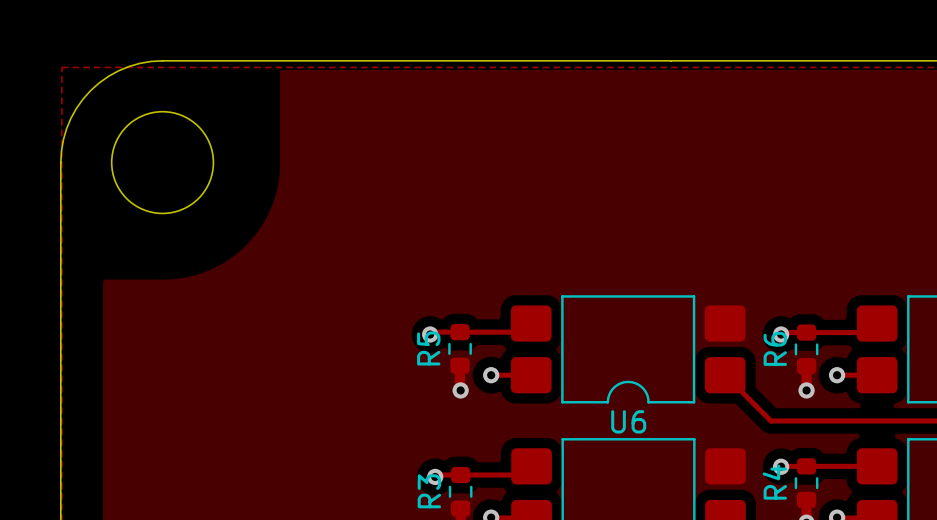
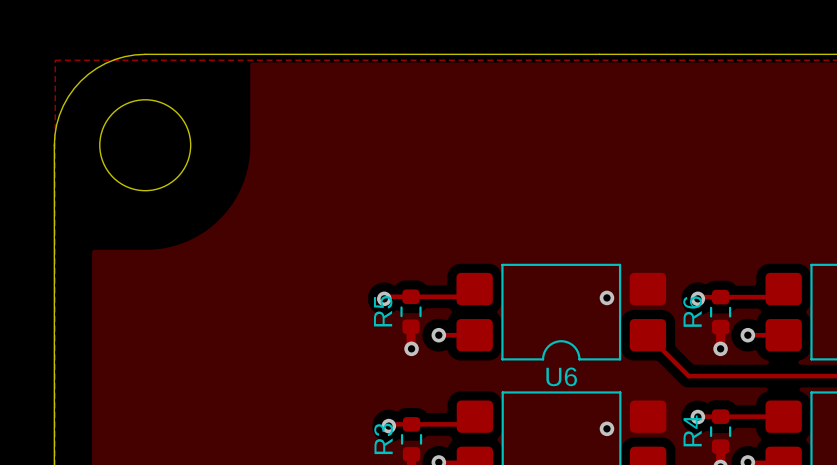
via: none -> (606, 297)
via: none -> (606, 428)

